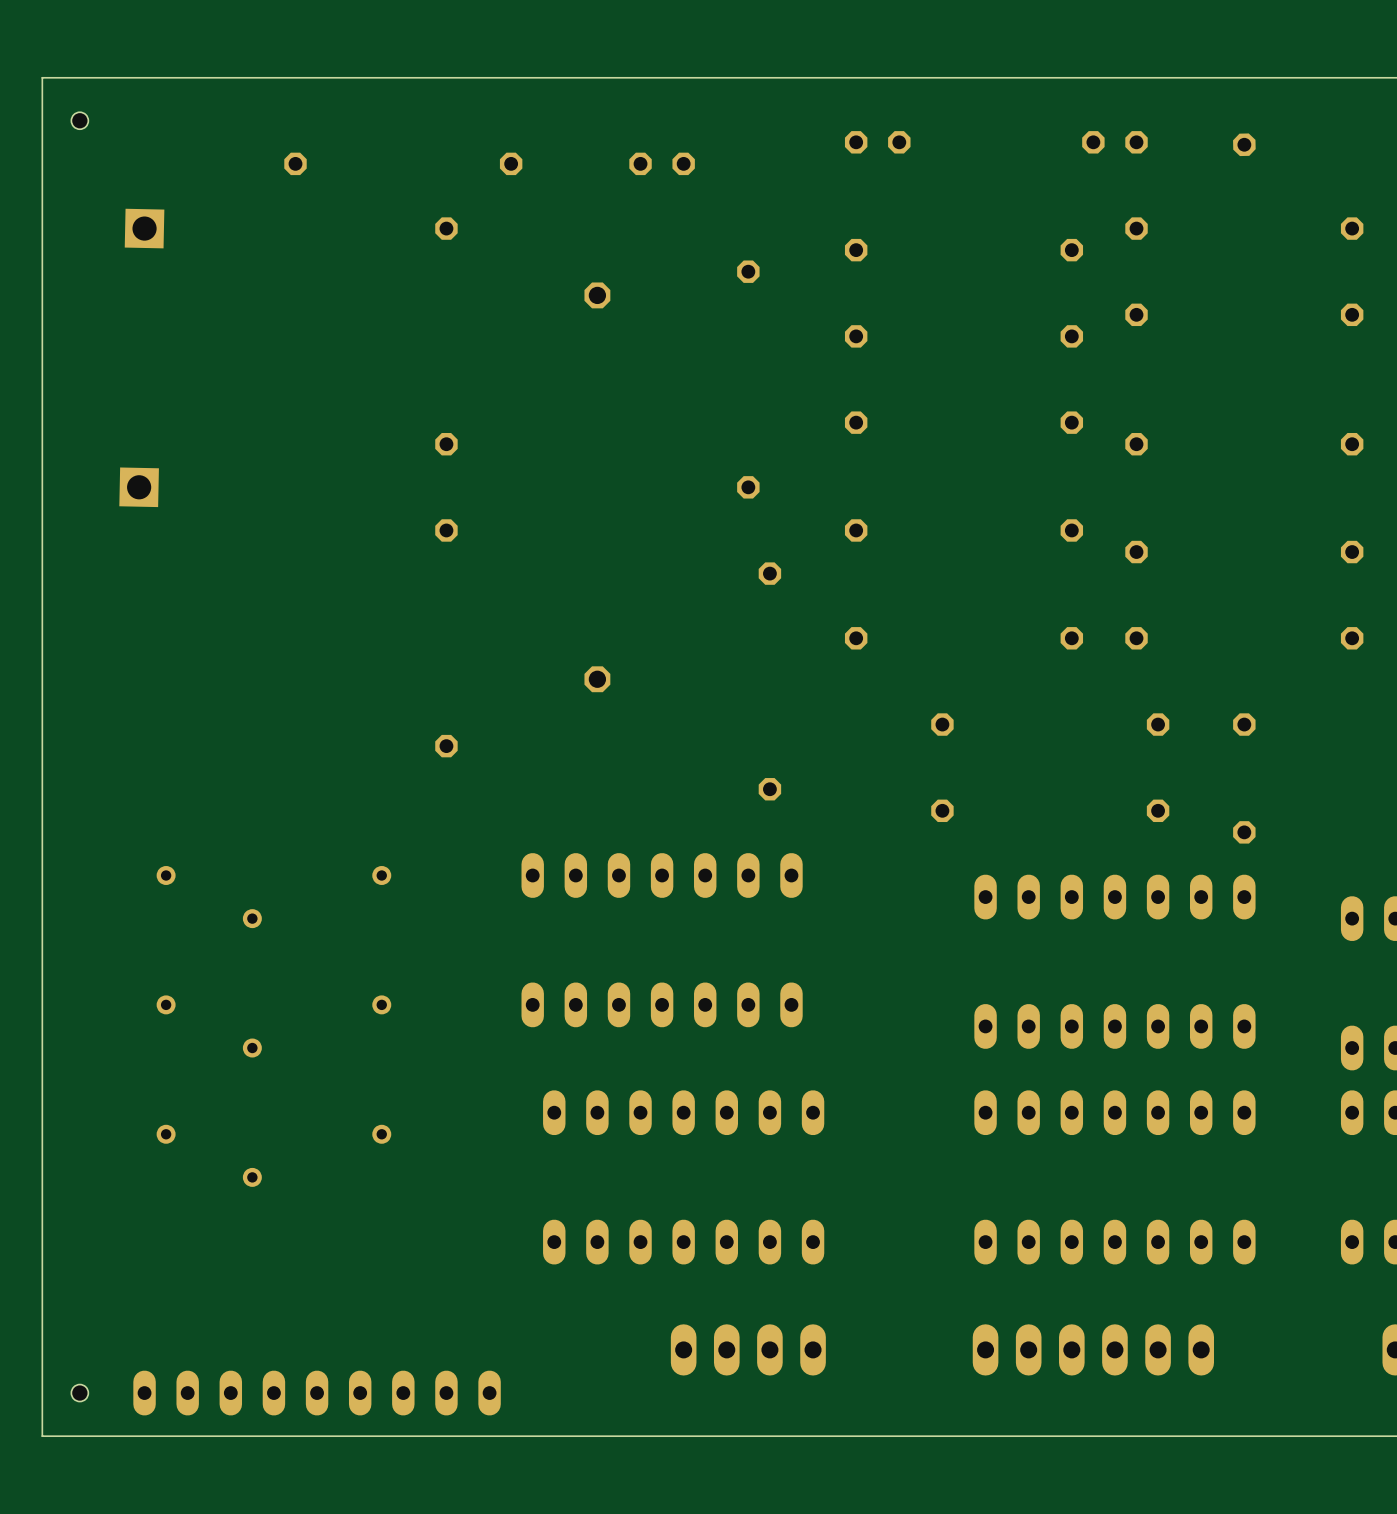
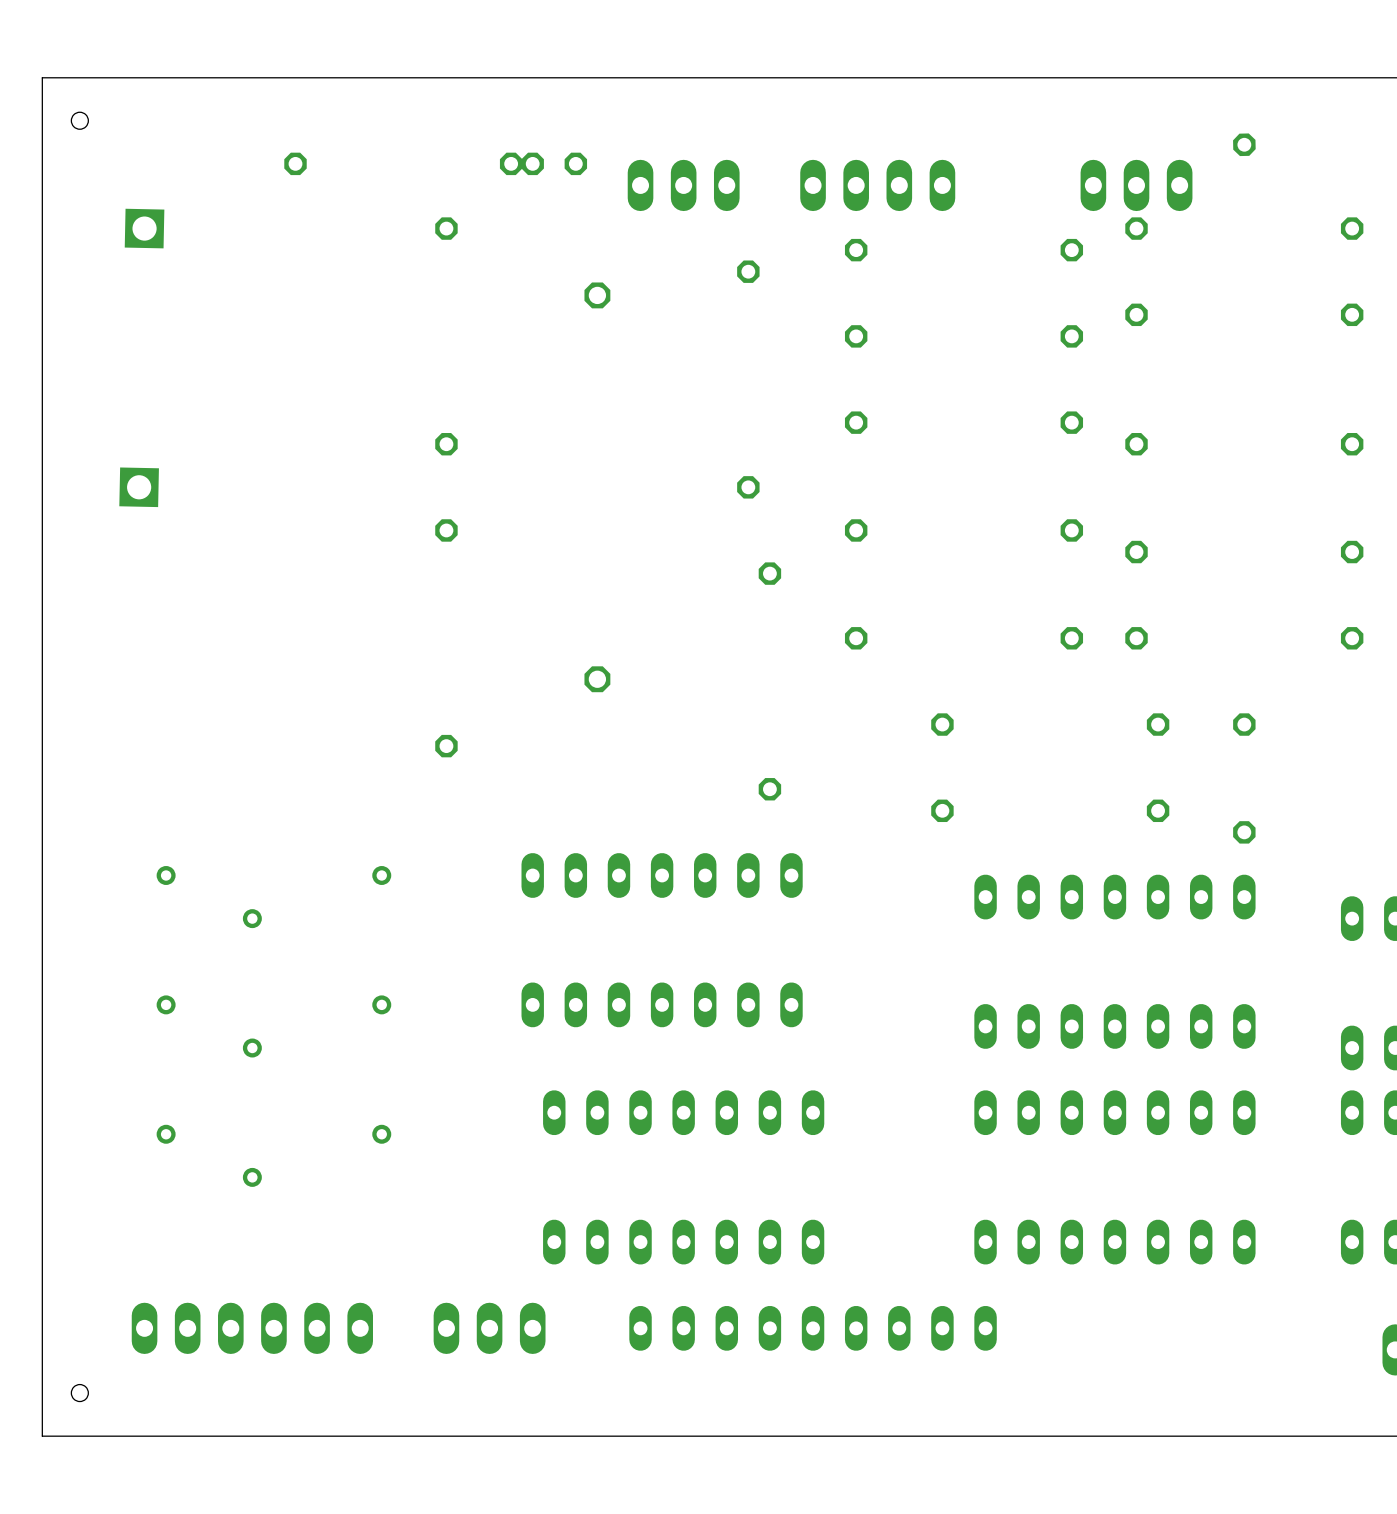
part: (877, 142) -> none
part: (1114, 142) -> none
part position: (662, 163) -> (554, 163)
part: none -> (683, 185)
part: none -> (877, 185)
part: none -> (1136, 185)
part: none -> (252, 1328)
part: none -> (489, 1328)
part: none -> (813, 1328)
part: (748, 1349) -> none
part: (1093, 1349) -> none
part: (317, 1393) -> none

